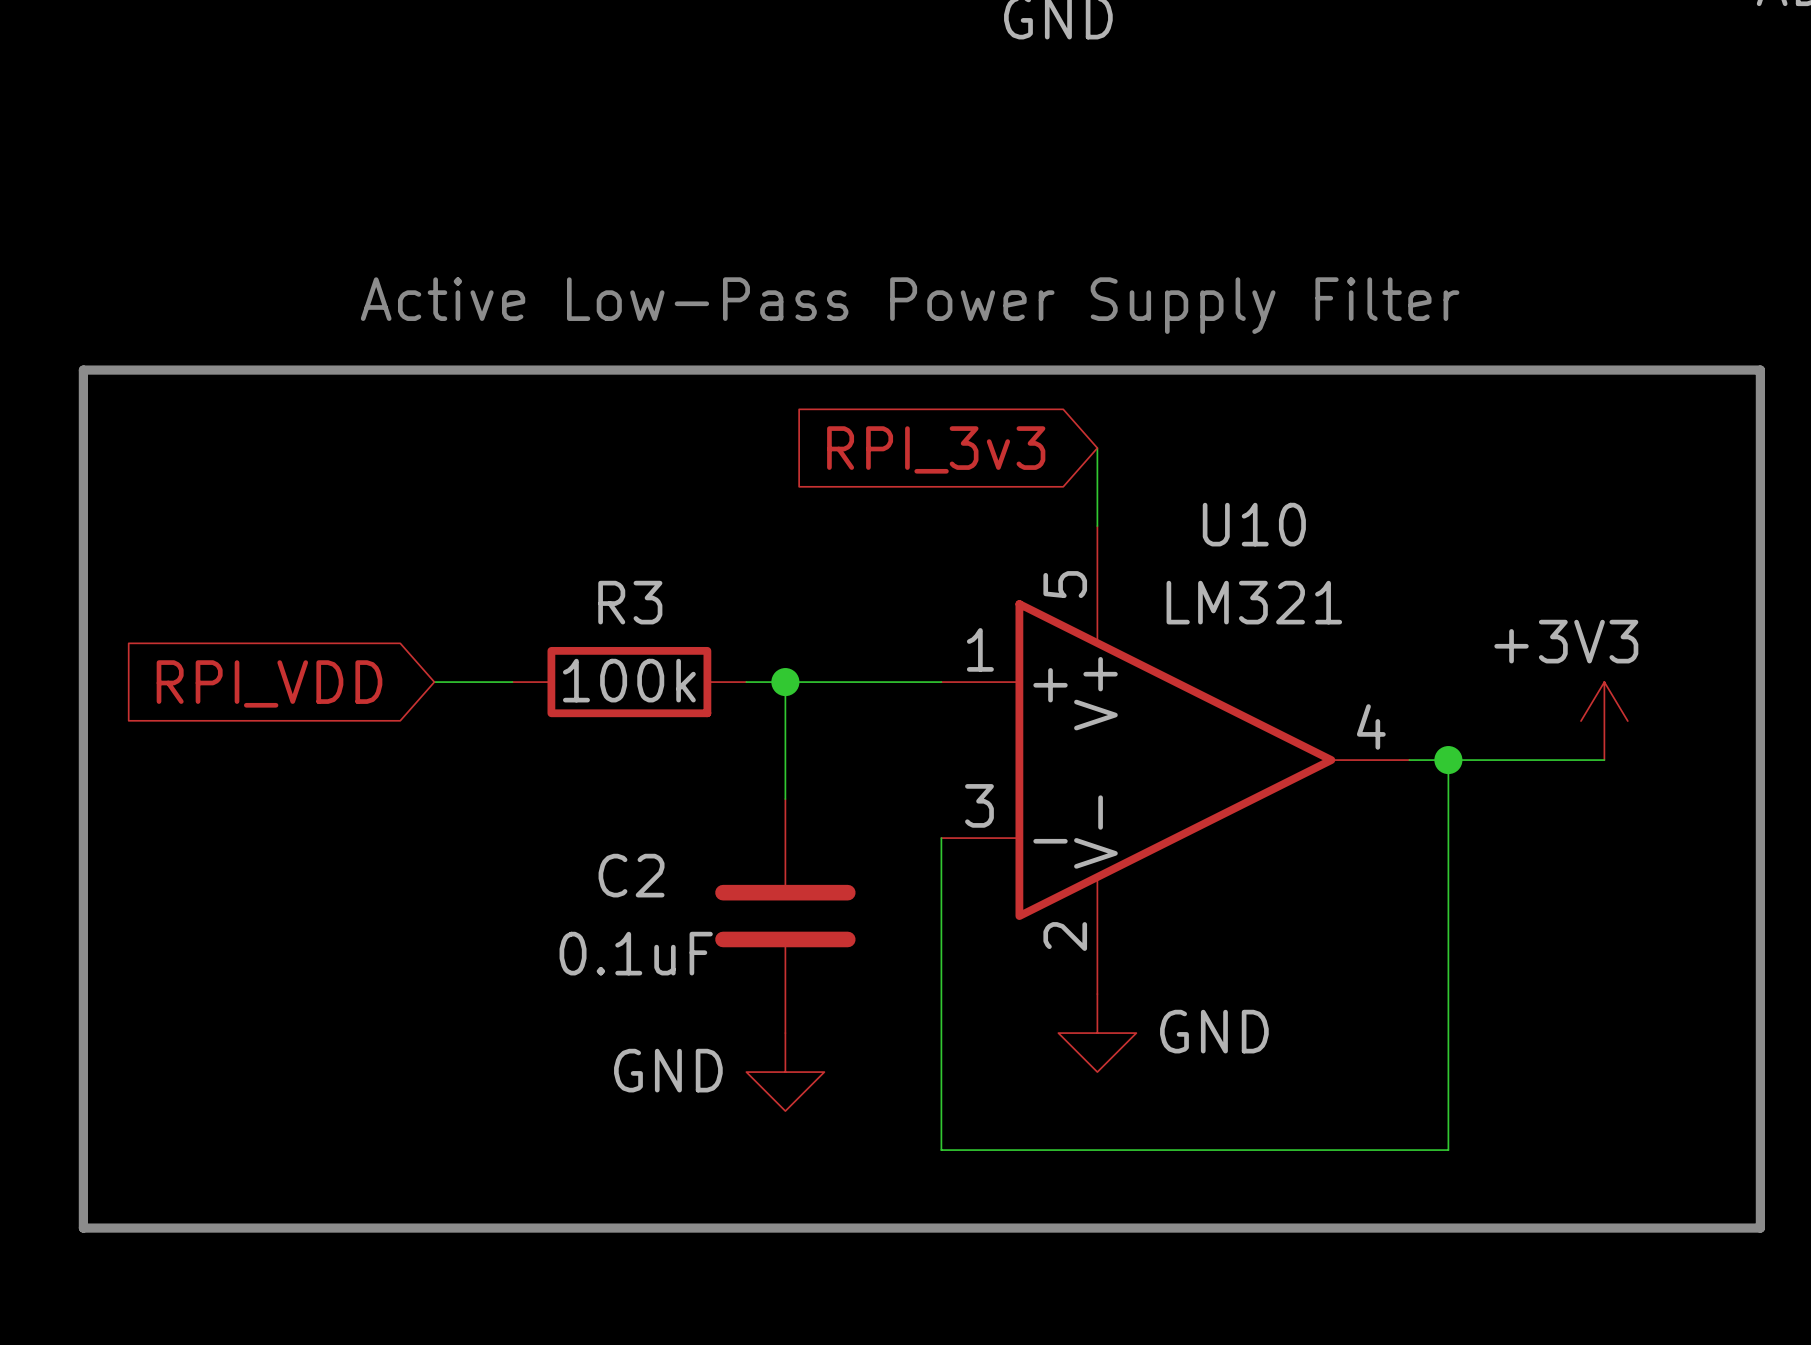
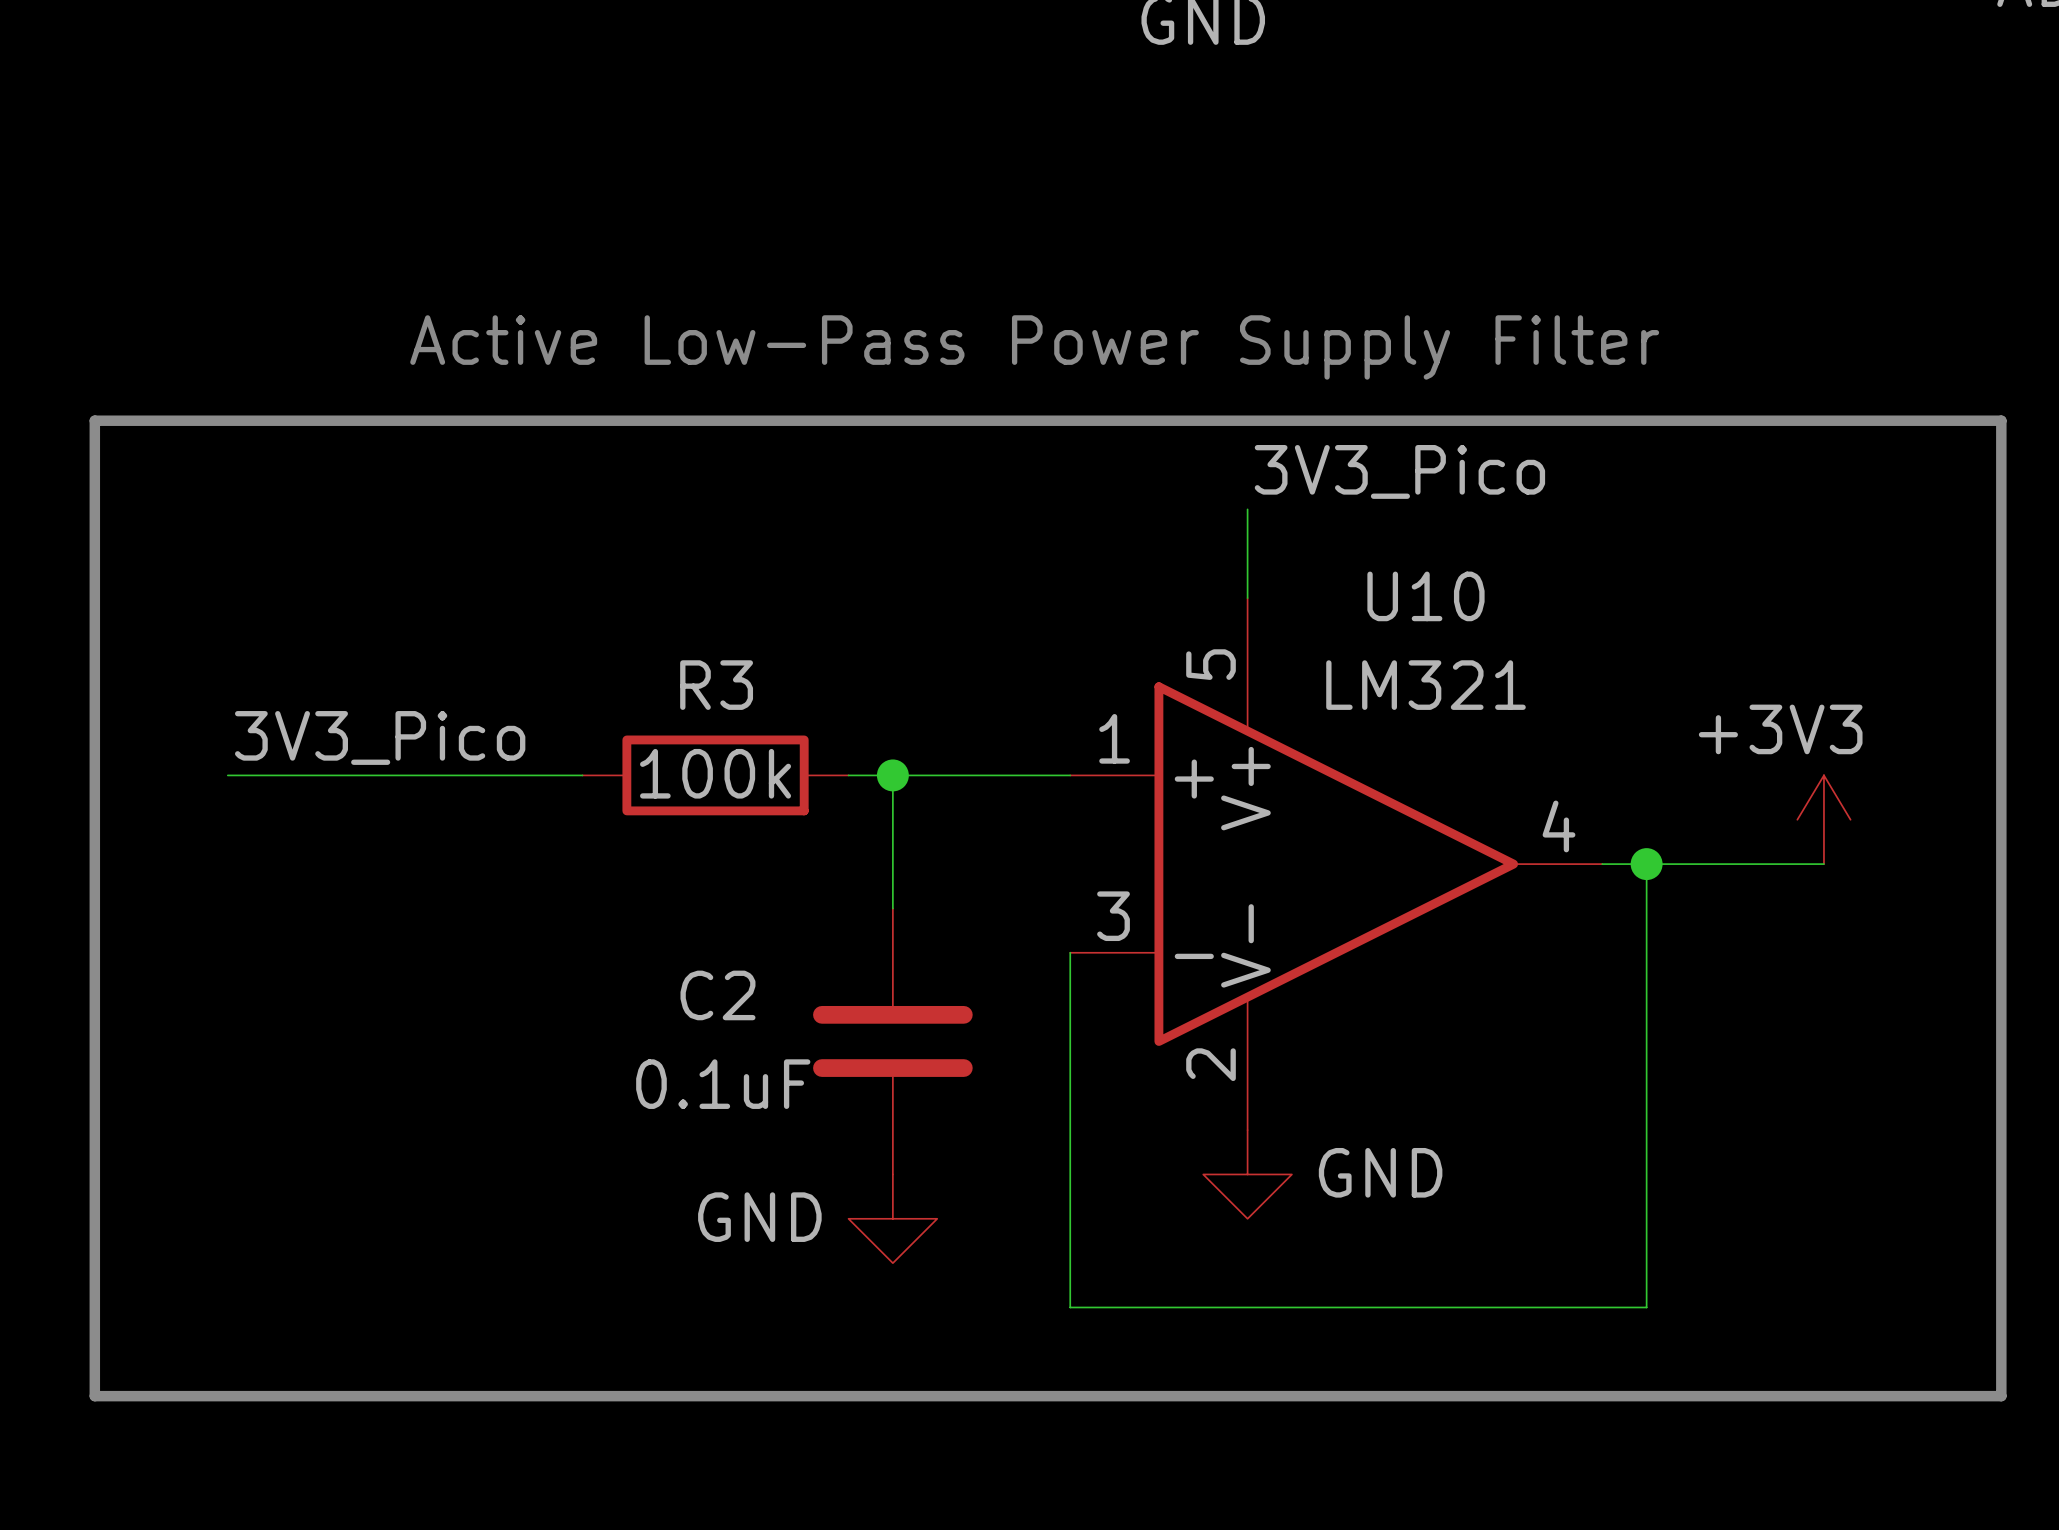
label: none -> 3V3_Pico (1399, 471)
global label: RPI_3v3 (936, 449) -> none
label: none -> 3V3_Pico (380, 737)
wire: none -> (227, 775) (493, 775)
global label: RPI_VDD (269, 683) -> none

